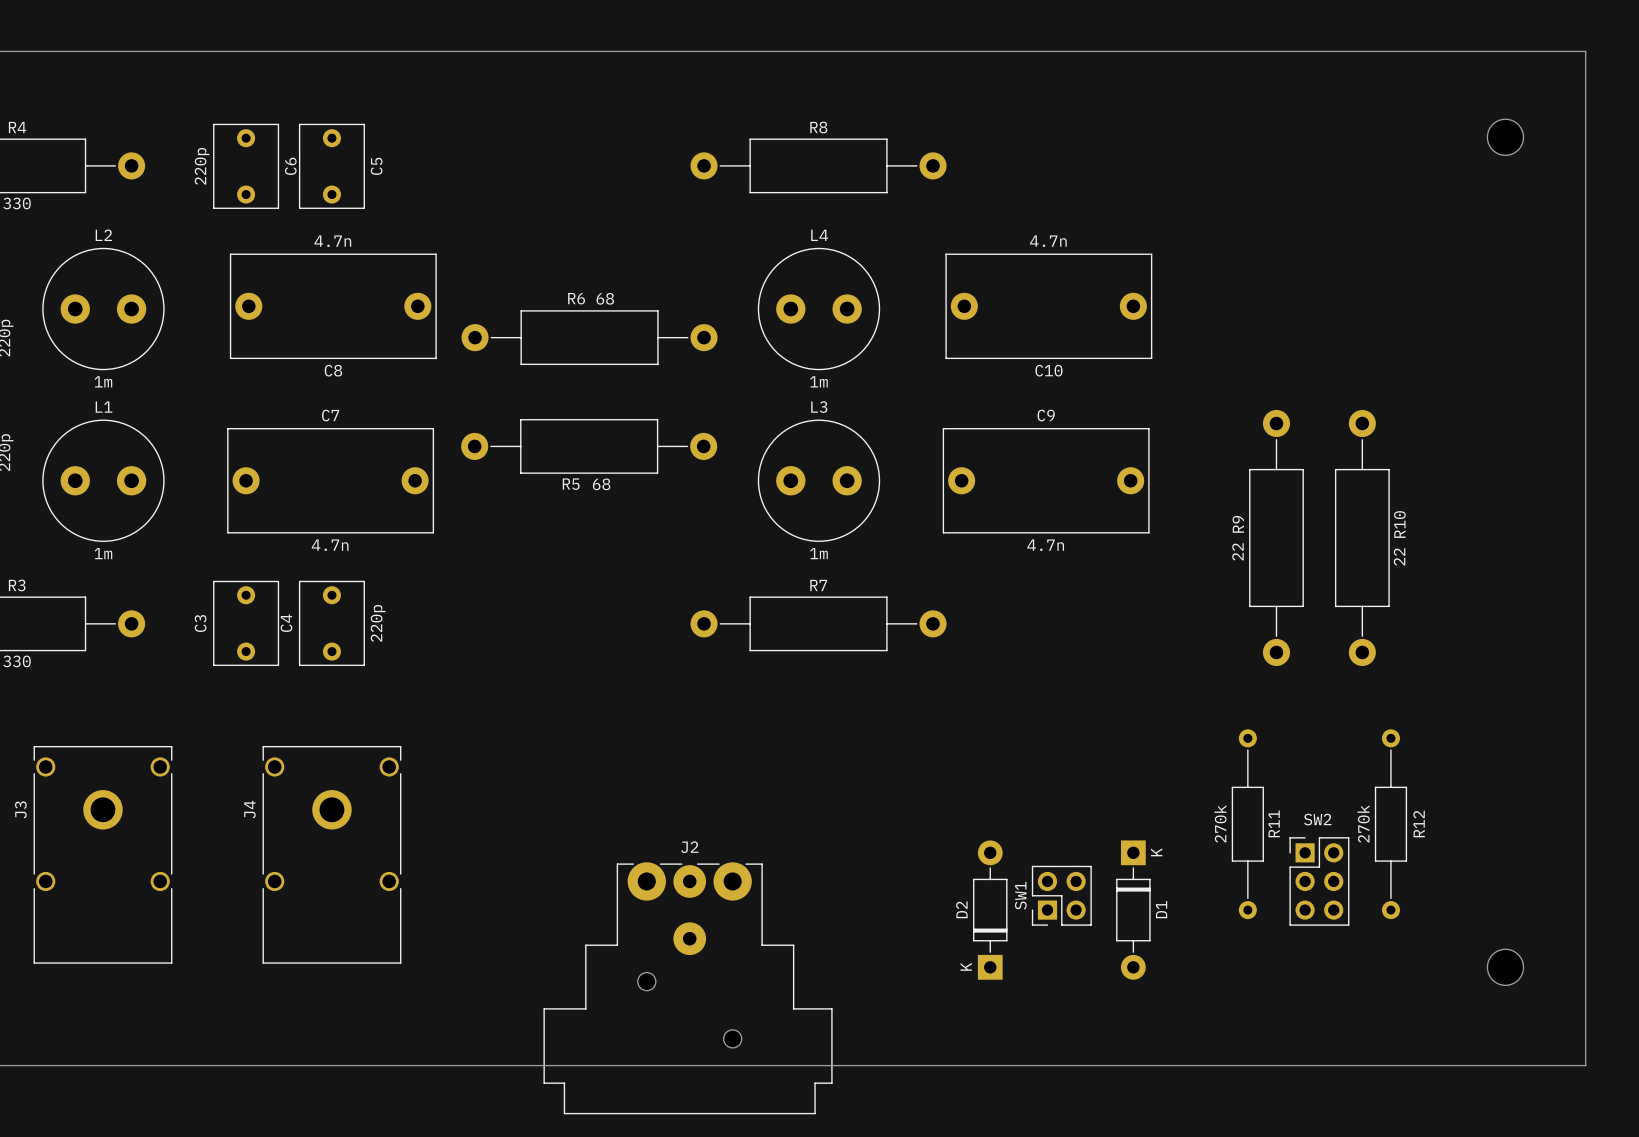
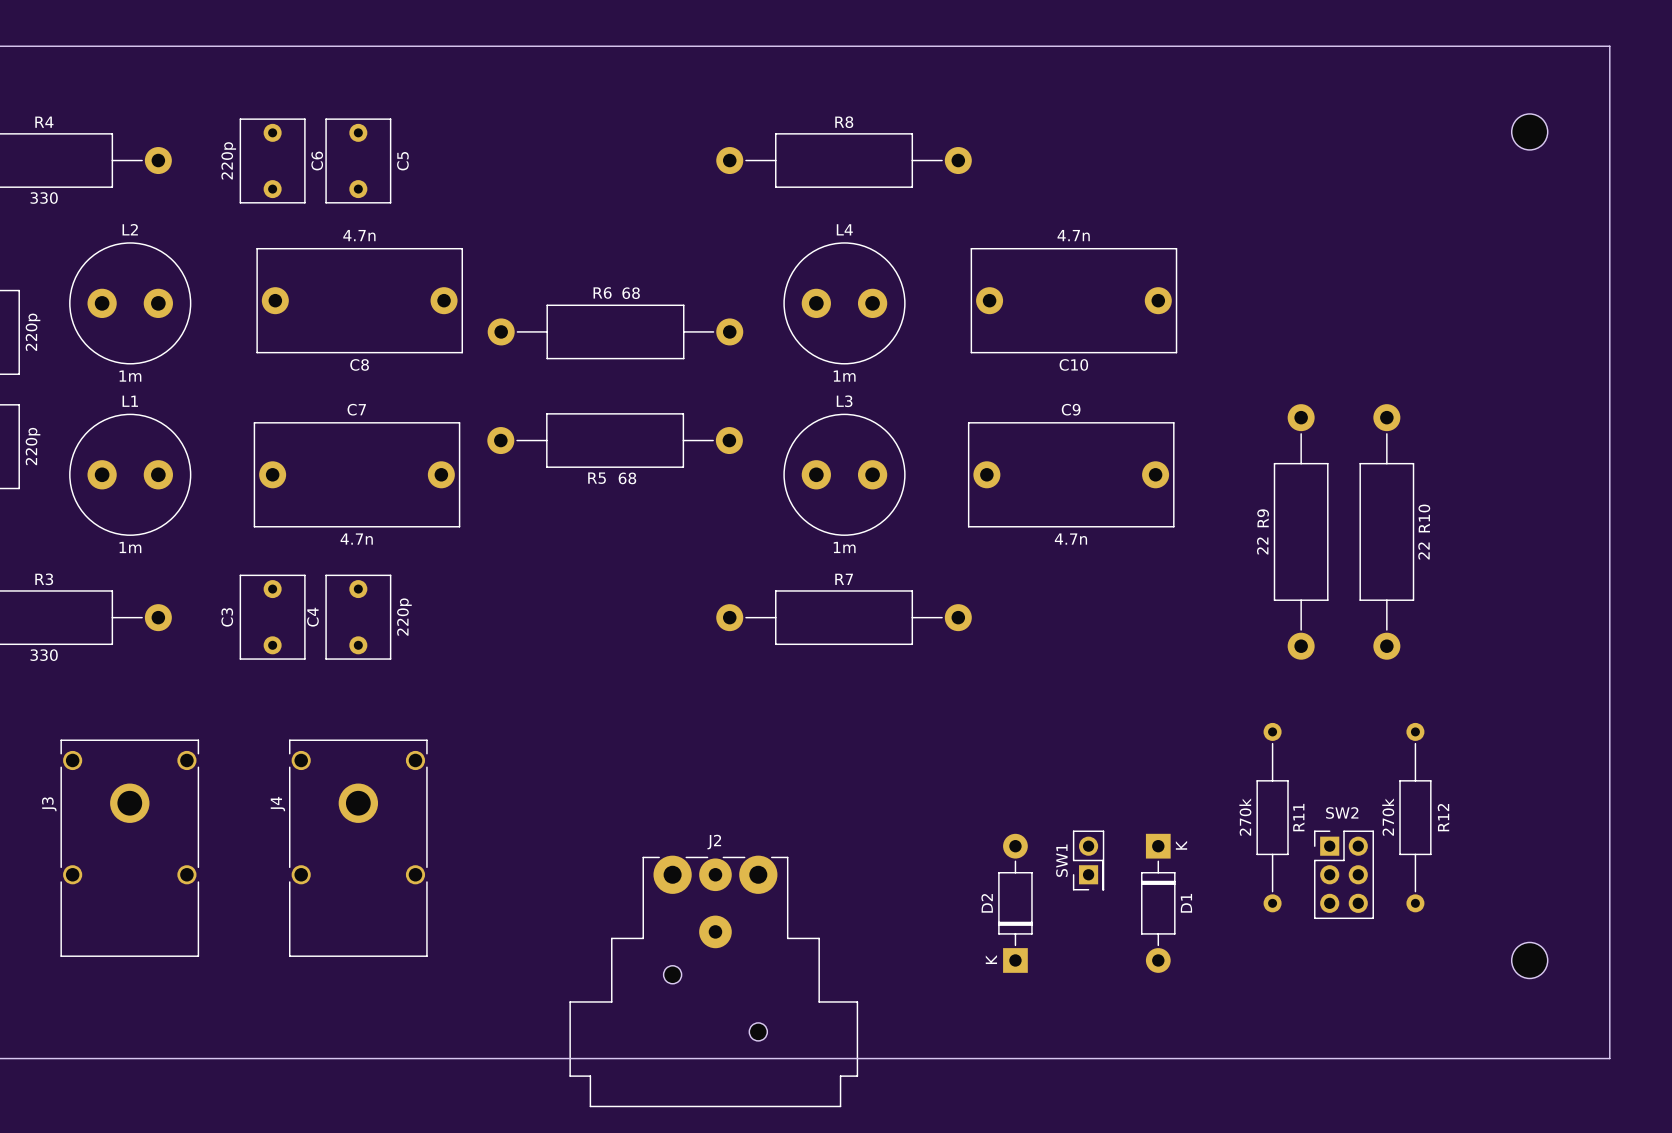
SW1 footprint: [1031, 865, 1092, 926] -> [1072, 830, 1105, 891]

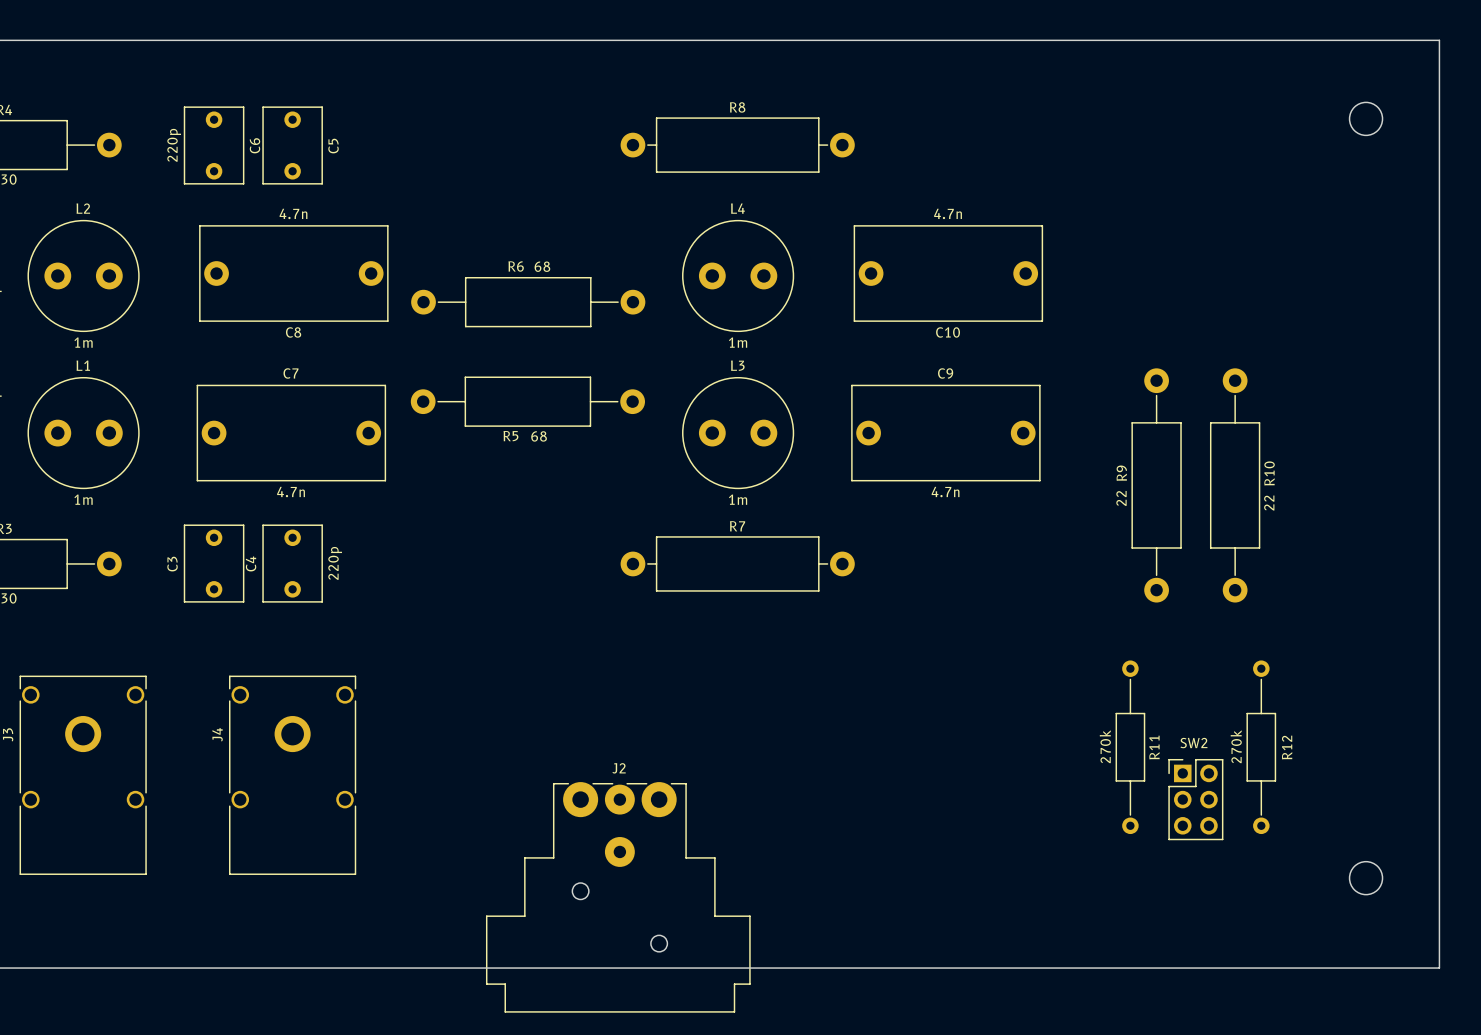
R8 footprint: [716, 133, 972, 188] -> [620, 117, 855, 173]
R7 footprint: [716, 590, 972, 645] -> [620, 536, 855, 592]
SW1: (1088, 860) -> none
D2: (1015, 903) -> none
D1: (1158, 903) -> none

